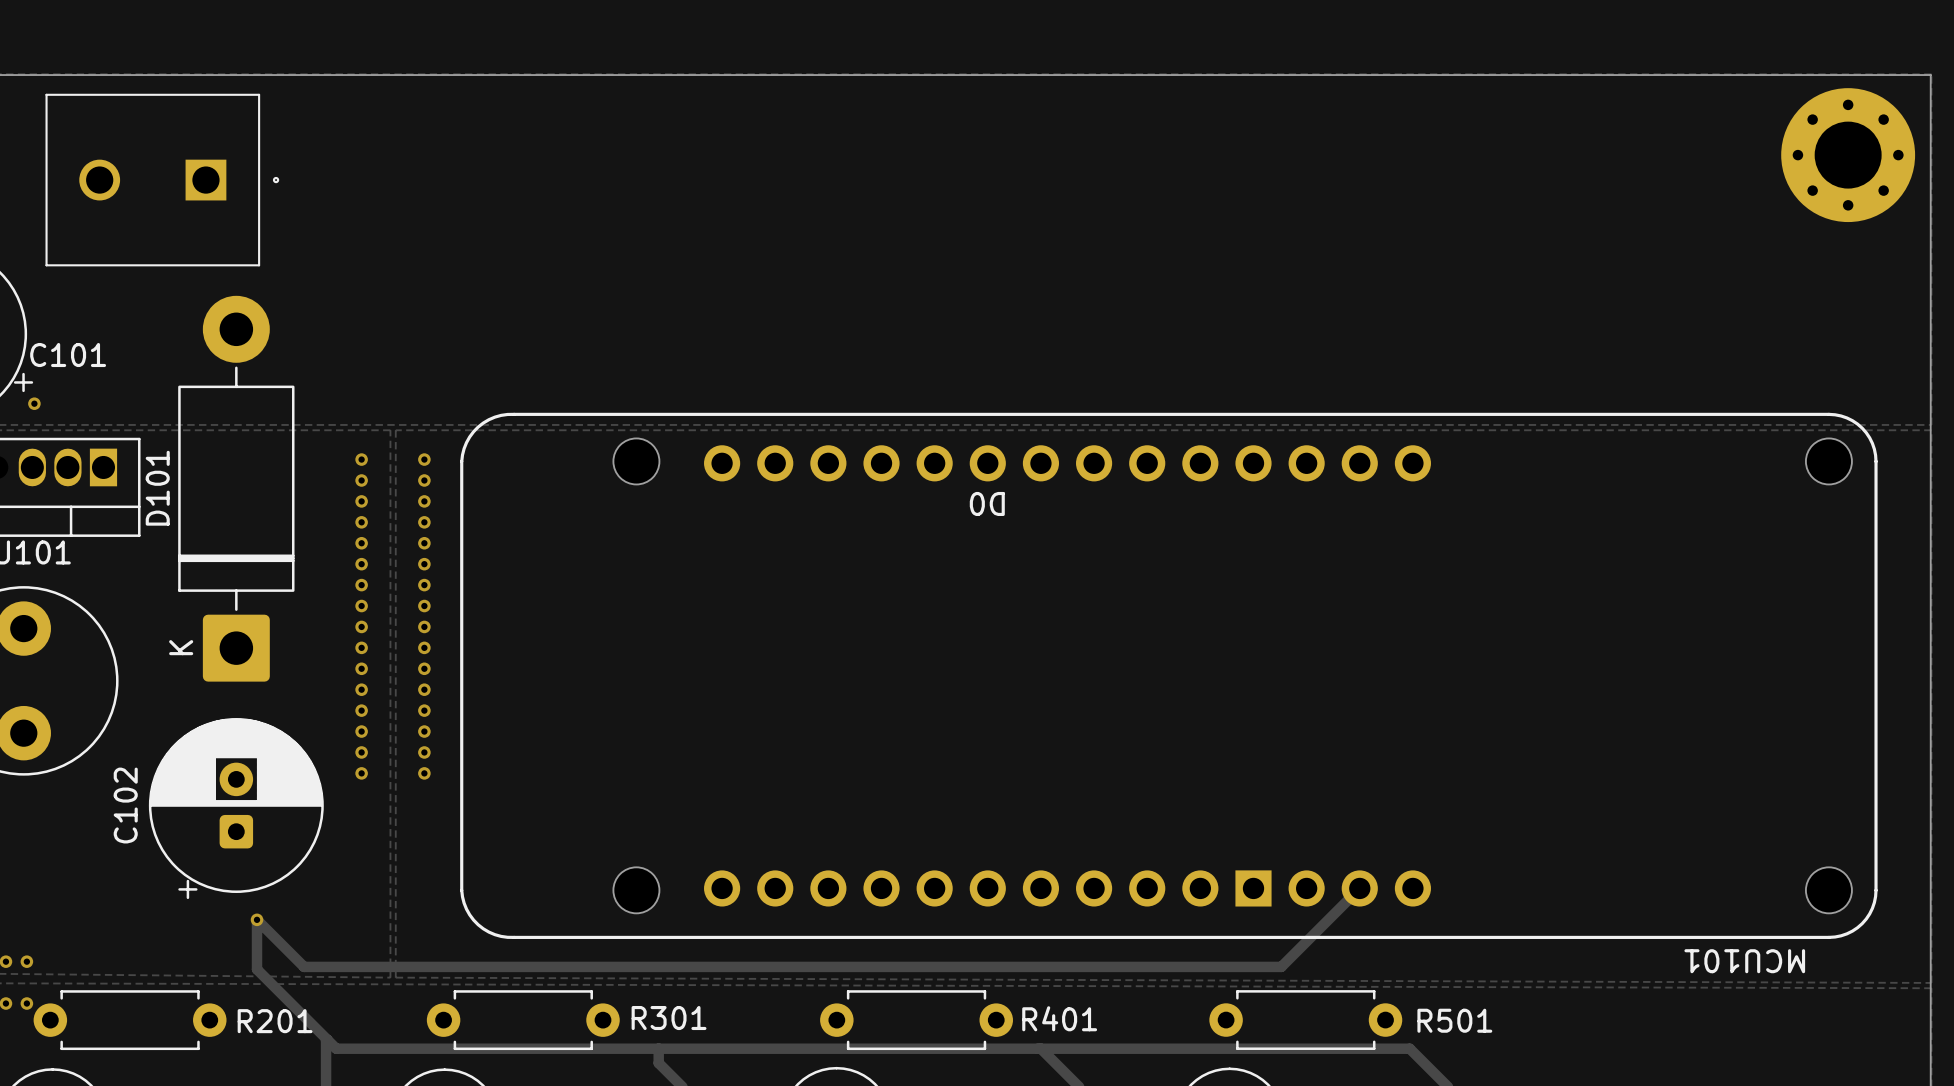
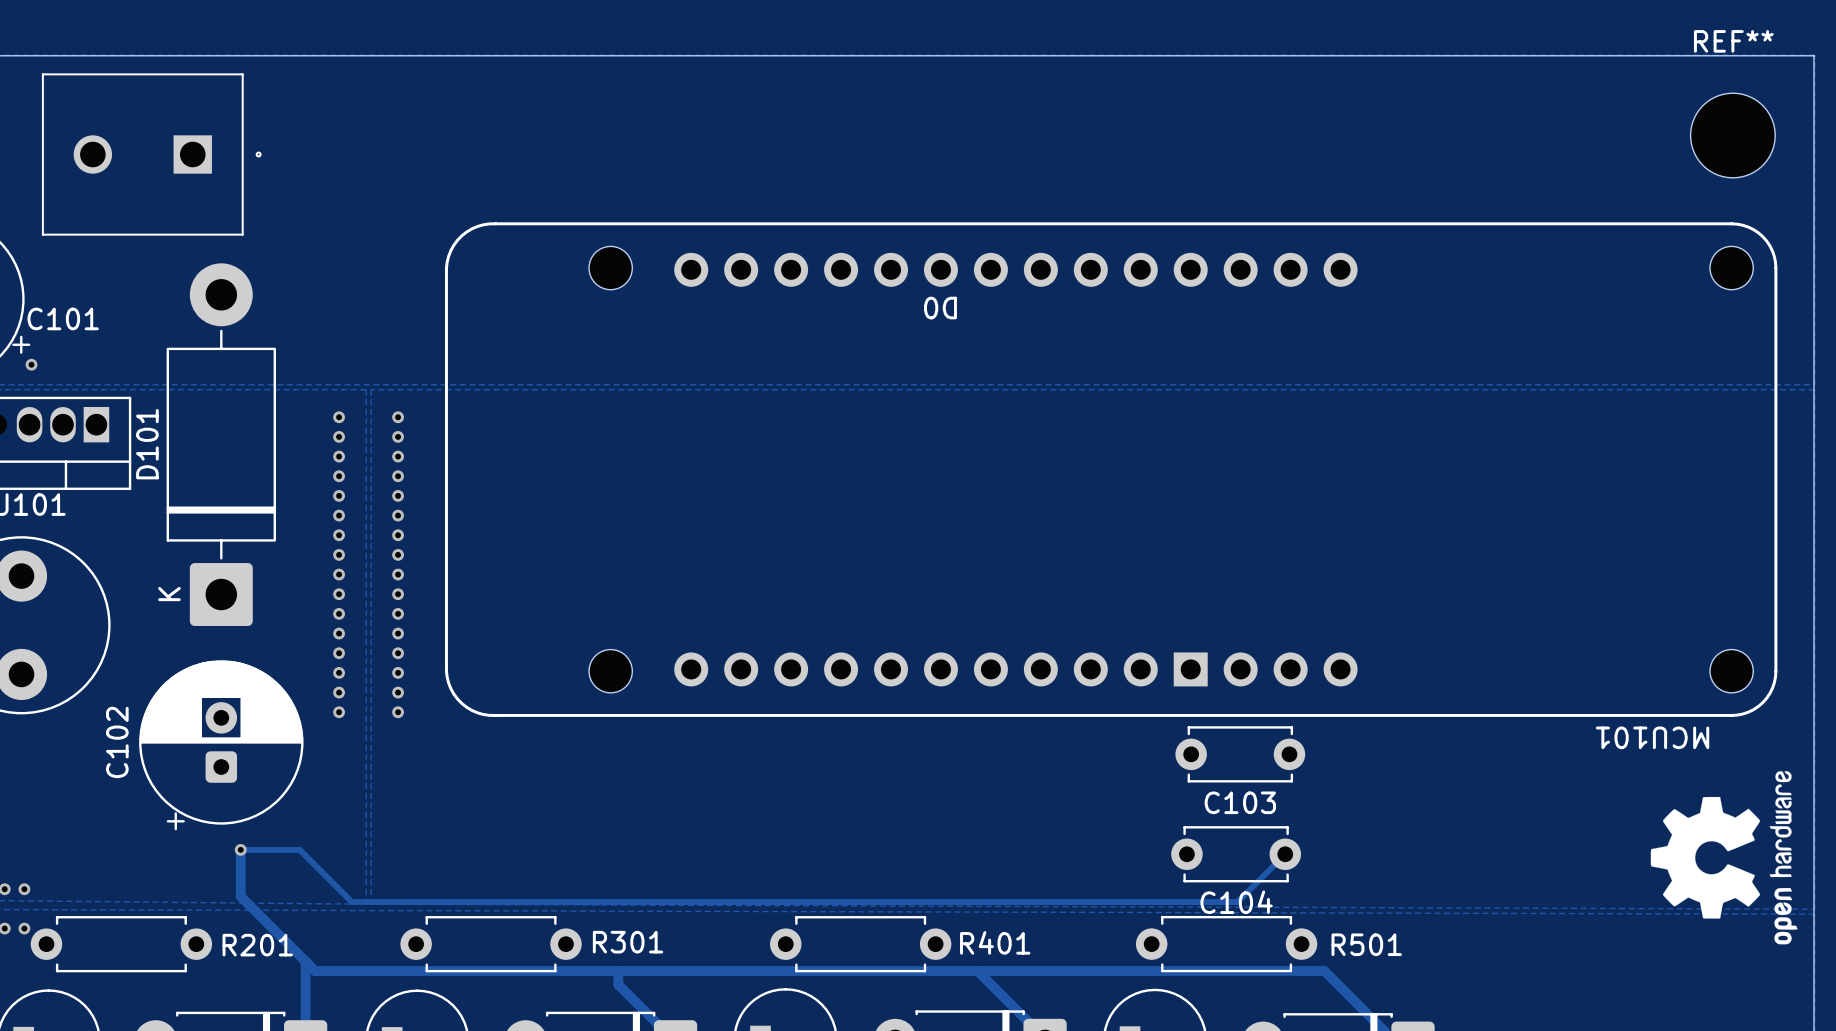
part: (1848, 155) -> none
REF**: none -> (1732, 135)
MCU101 position: (1168, 675) -> (1111, 469)
C103: none -> (1240, 754)
drawing: none -> [1650, 771, 1798, 945]
track: (1359, 888) (1281, 966) (304, 966) (257, 919) -> (1285, 854) (1237, 902) (351, 902) (299, 849) (240, 849)
C104: none -> (1236, 854)

